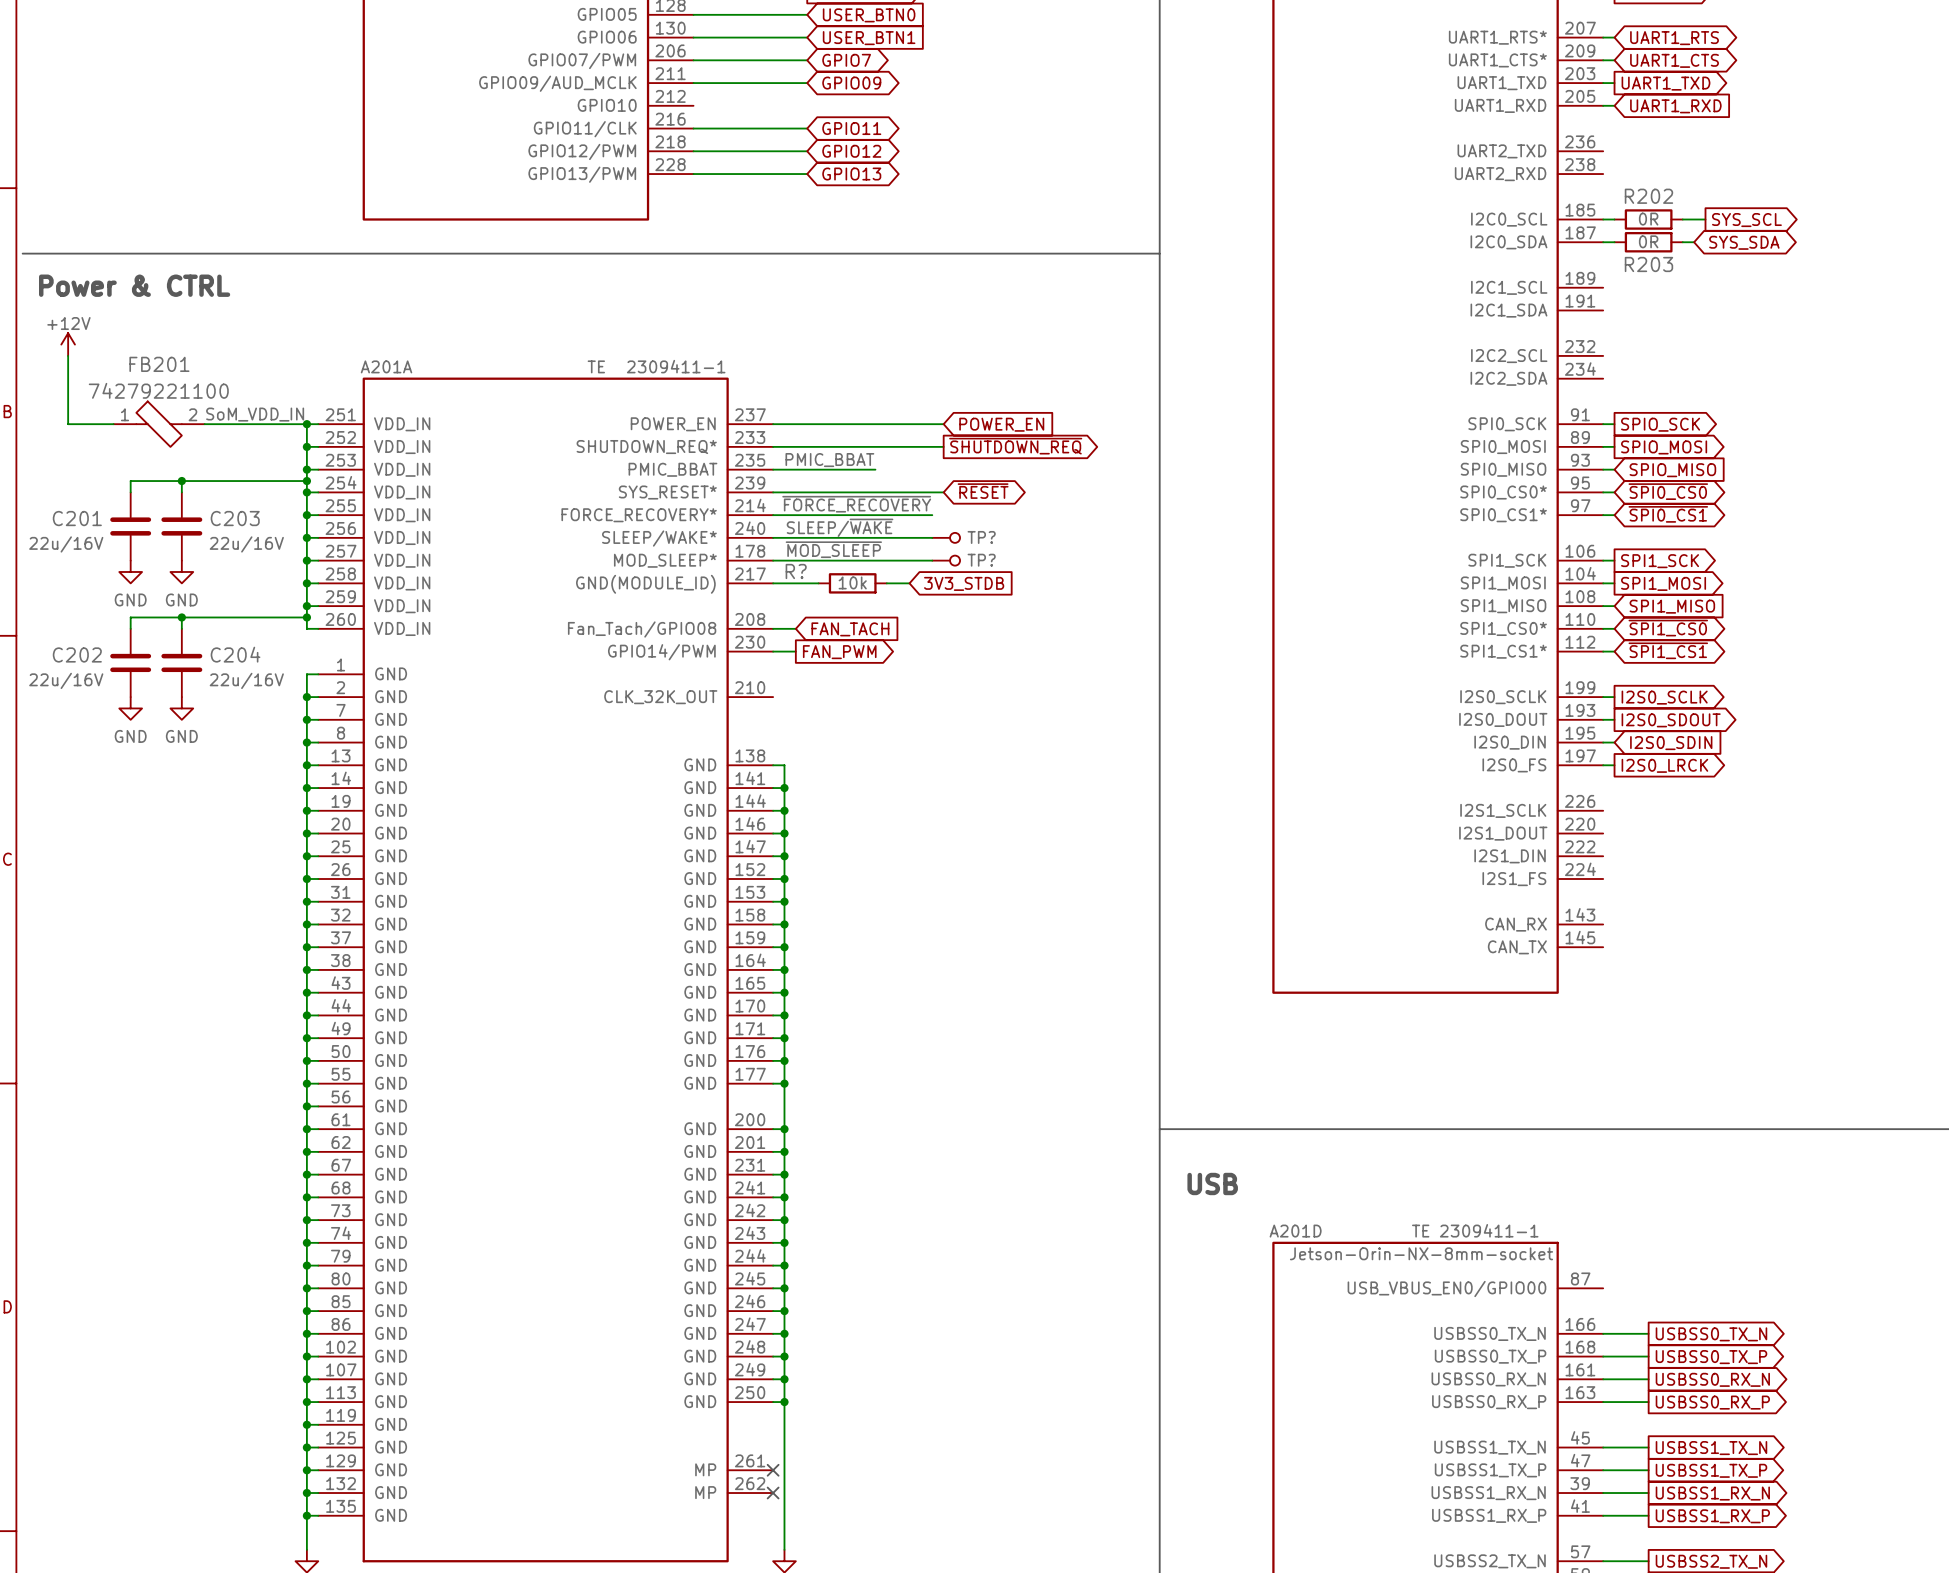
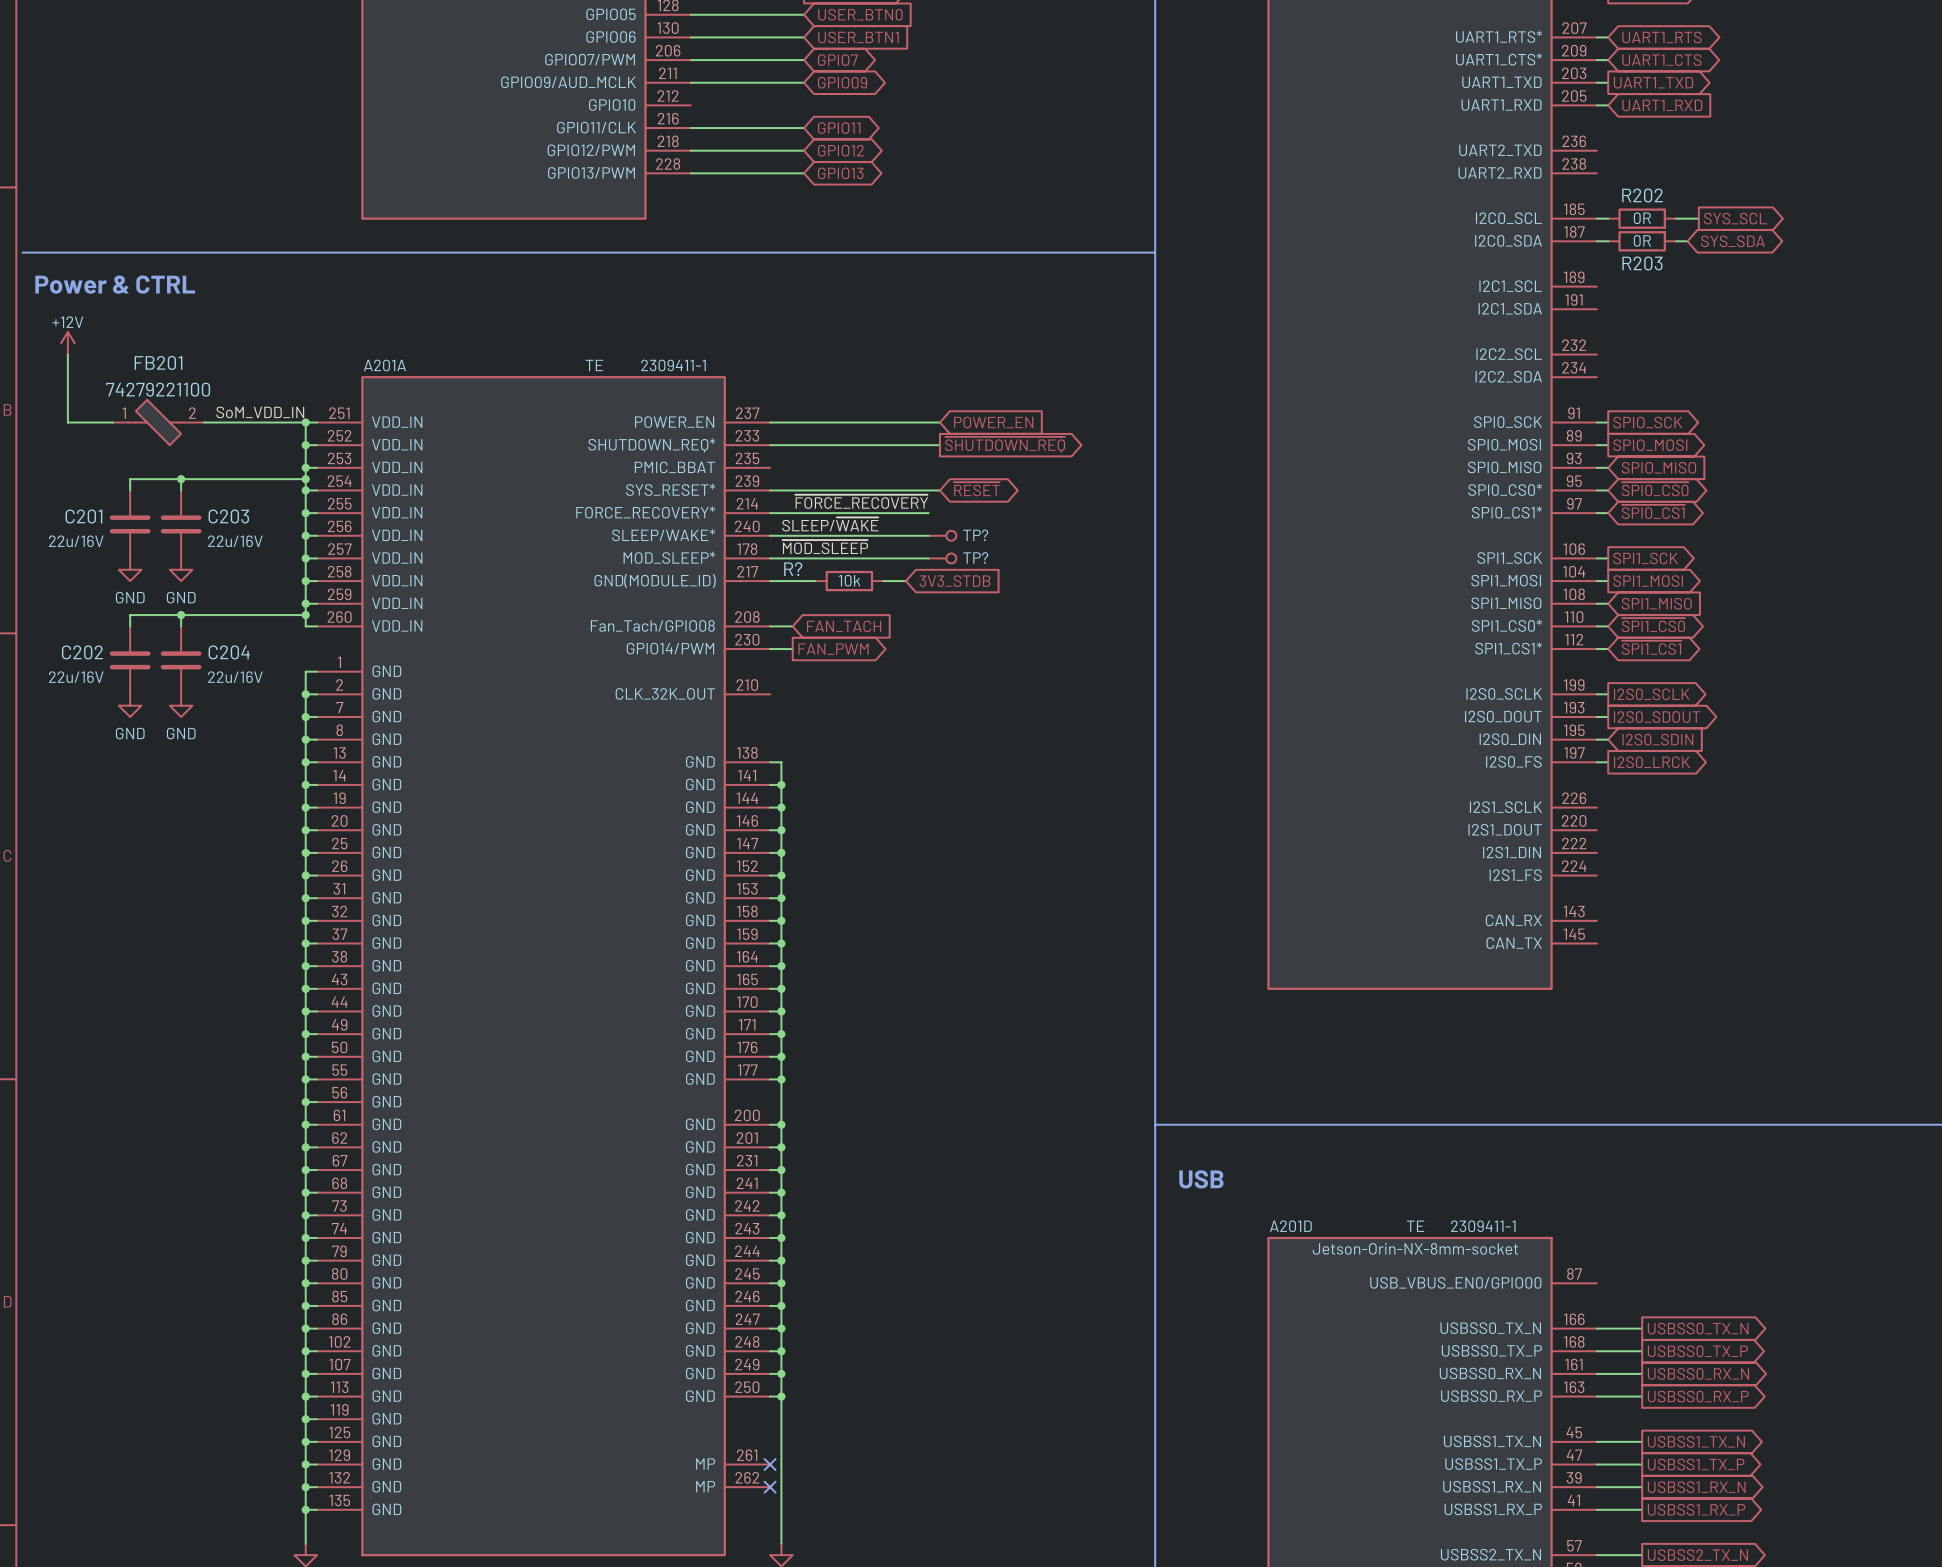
label: PMIC_BBAT (829, 460) -> none
wire: (773, 469) (875, 469) -> none

